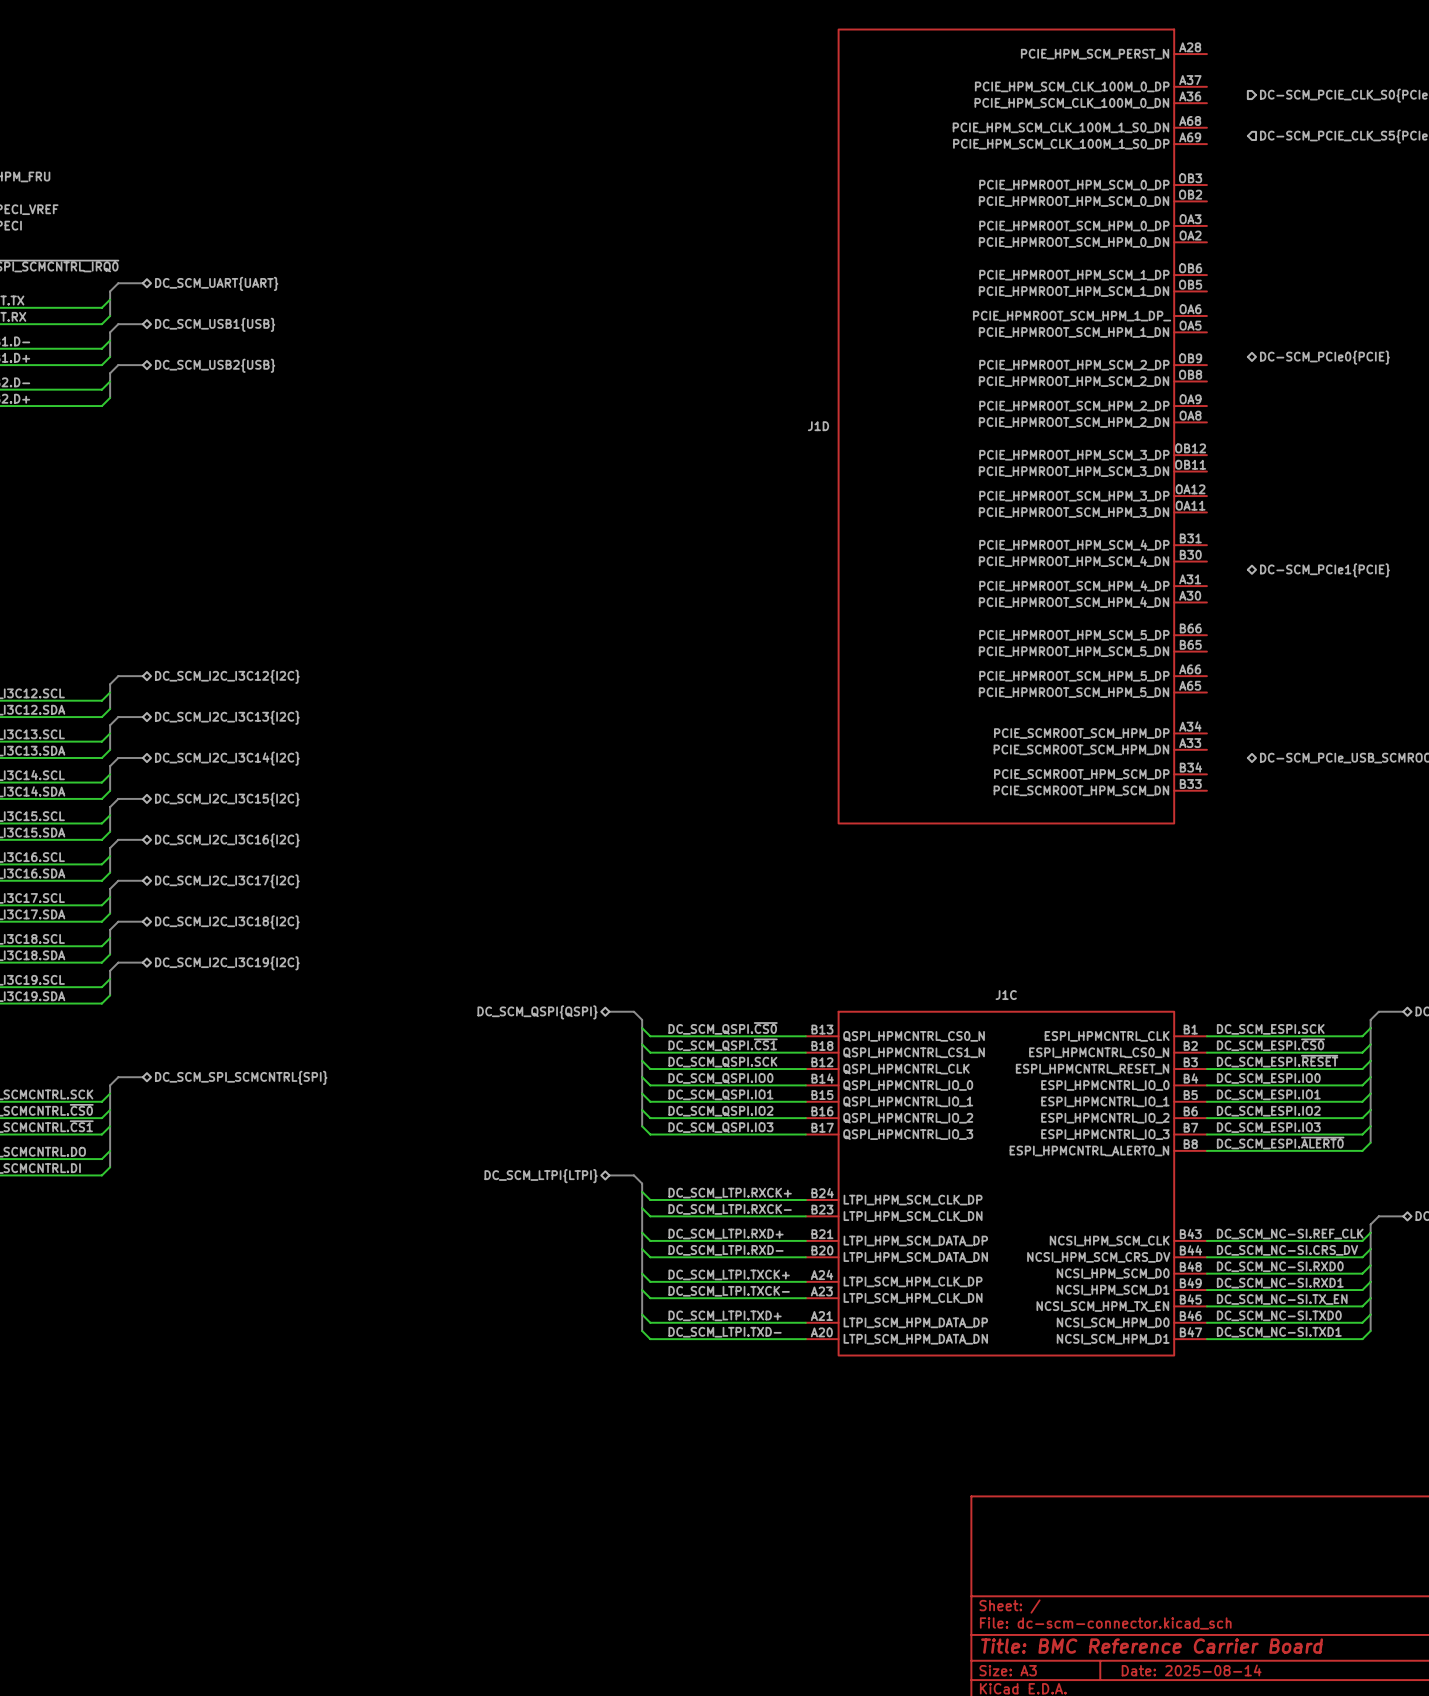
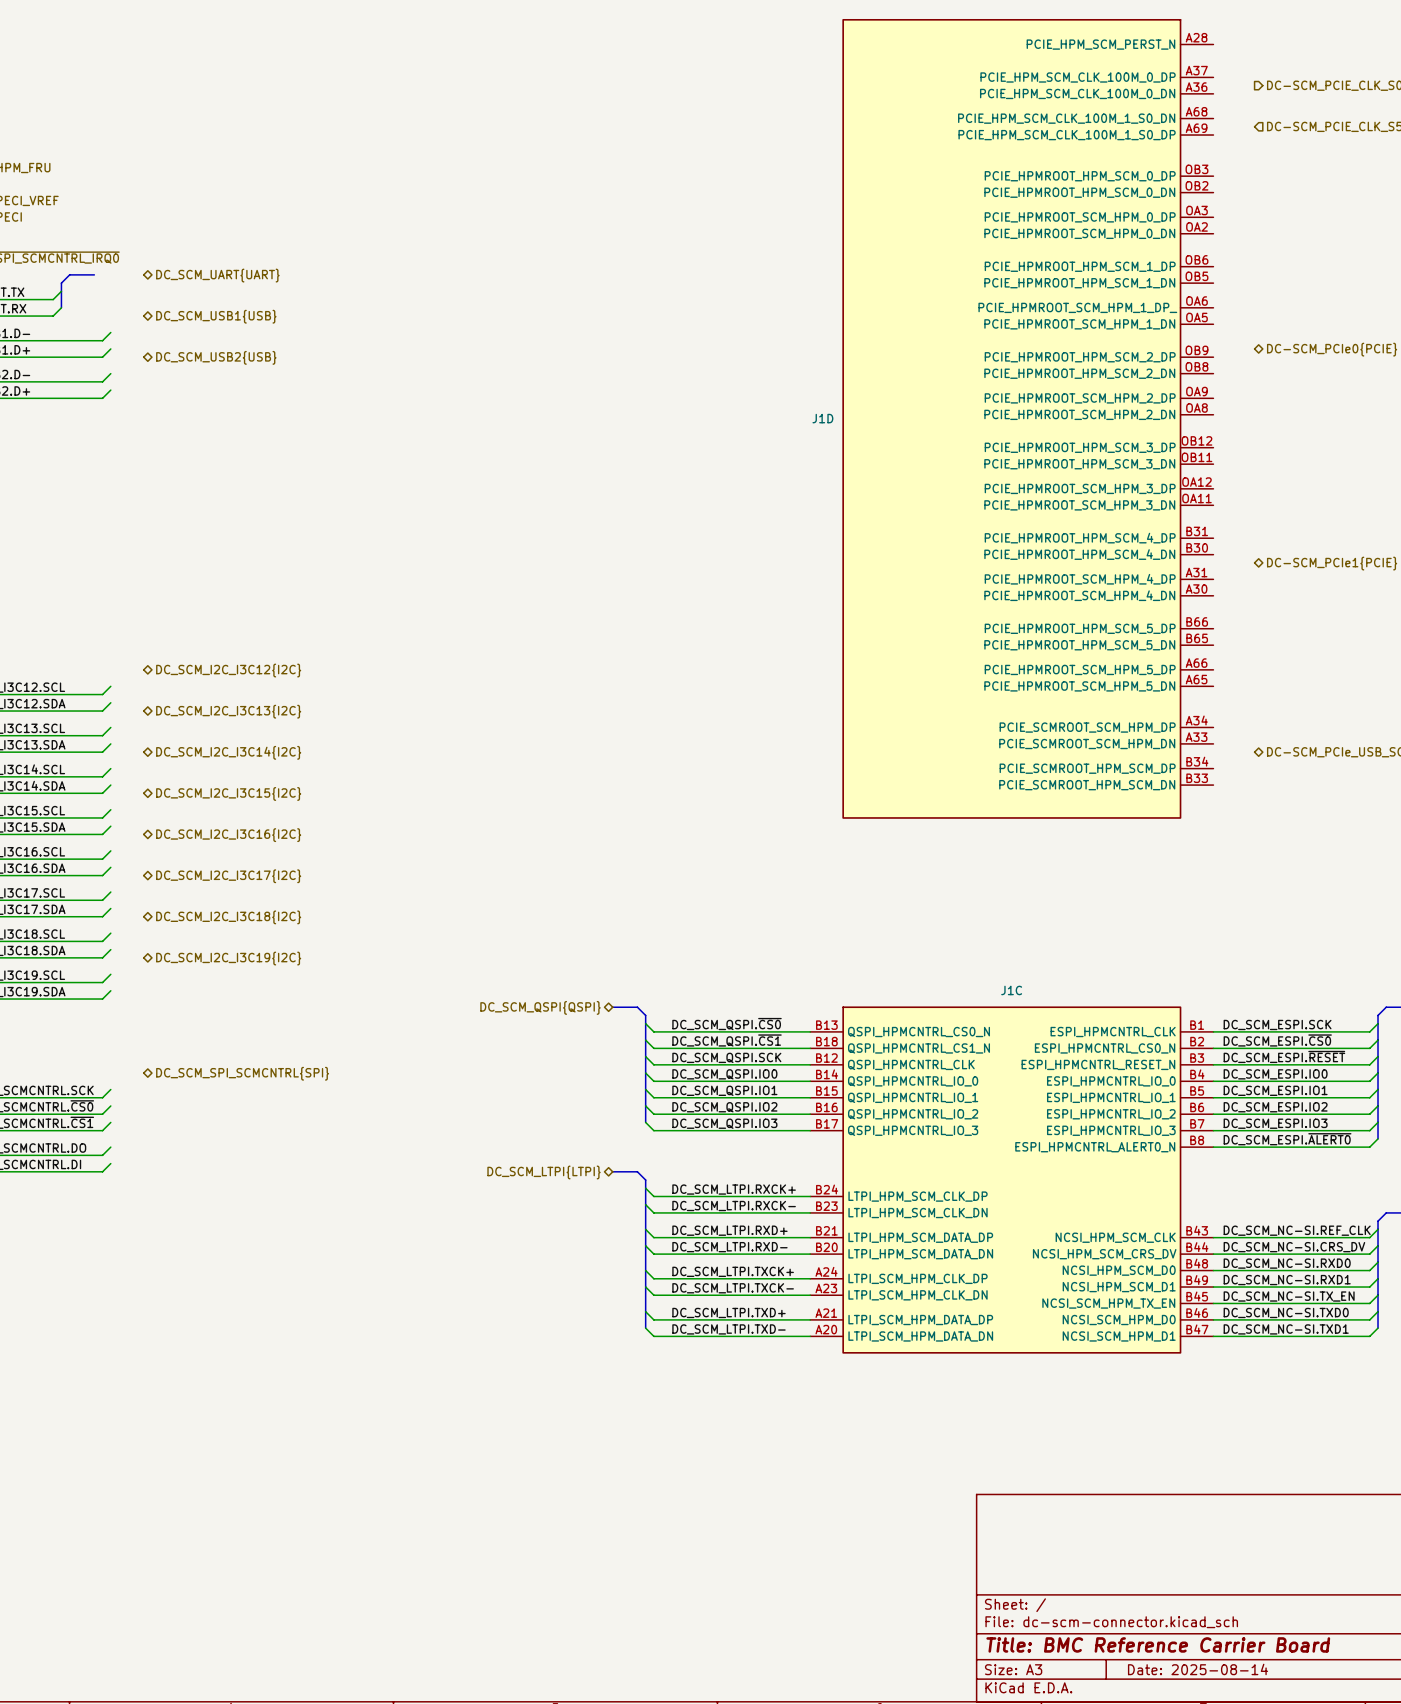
bus: (142, 283) (118, 283) (110, 291) (110, 316) -> (94, 274) (69, 274) (61, 283) (61, 307)
wire: (110, 299) (101, 307) (52, 307) -> (61, 291) (53, 299)
wire: (110, 316) (101, 324) (52, 324) -> (61, 307) (53, 316)
bus: (142, 324) (118, 324) (110, 332) (110, 356) -> none
bus: (142, 365) (118, 365) (110, 373) (110, 397) -> none
bus: (142, 676) (118, 676) (110, 684) (110, 708) -> none
bus: (142, 717) (118, 717) (110, 725) (110, 749) -> none
bus: (142, 757) (118, 757) (110, 766) (110, 790) -> none
bus: (142, 798) (118, 798) (110, 807) (110, 831) -> none
bus: (142, 839) (118, 839) (110, 848) (110, 872) -> none
bus: (142, 880) (118, 880) (110, 888) (110, 913) -> none
bus: (142, 921) (118, 921) (110, 929) (110, 954) -> none
bus: (142, 962) (118, 962) (110, 970) (110, 995) -> none
bus: (142, 1077) (118, 1077) (110, 1085) (110, 1167) -> none

